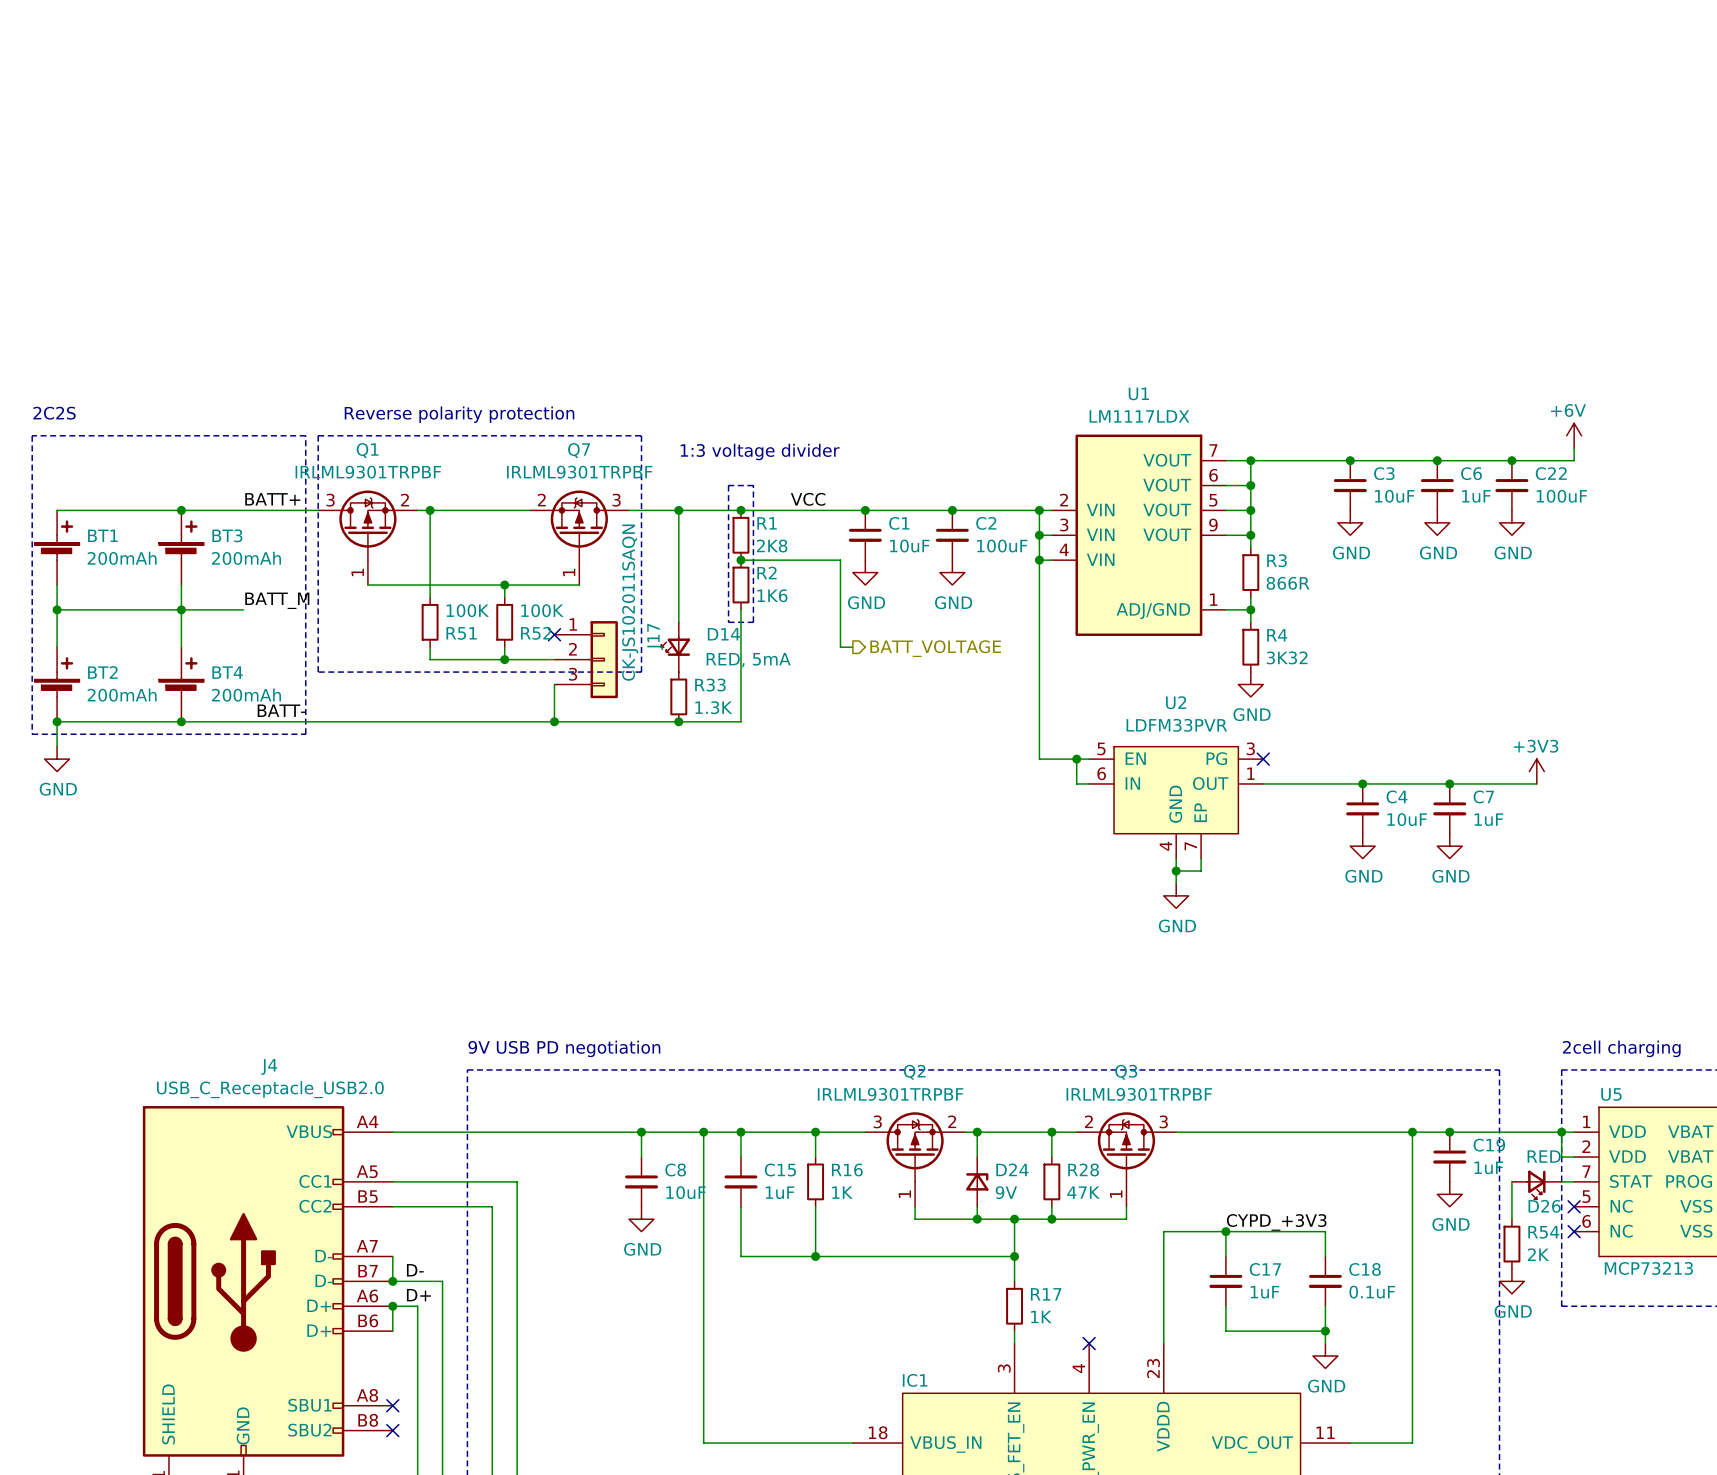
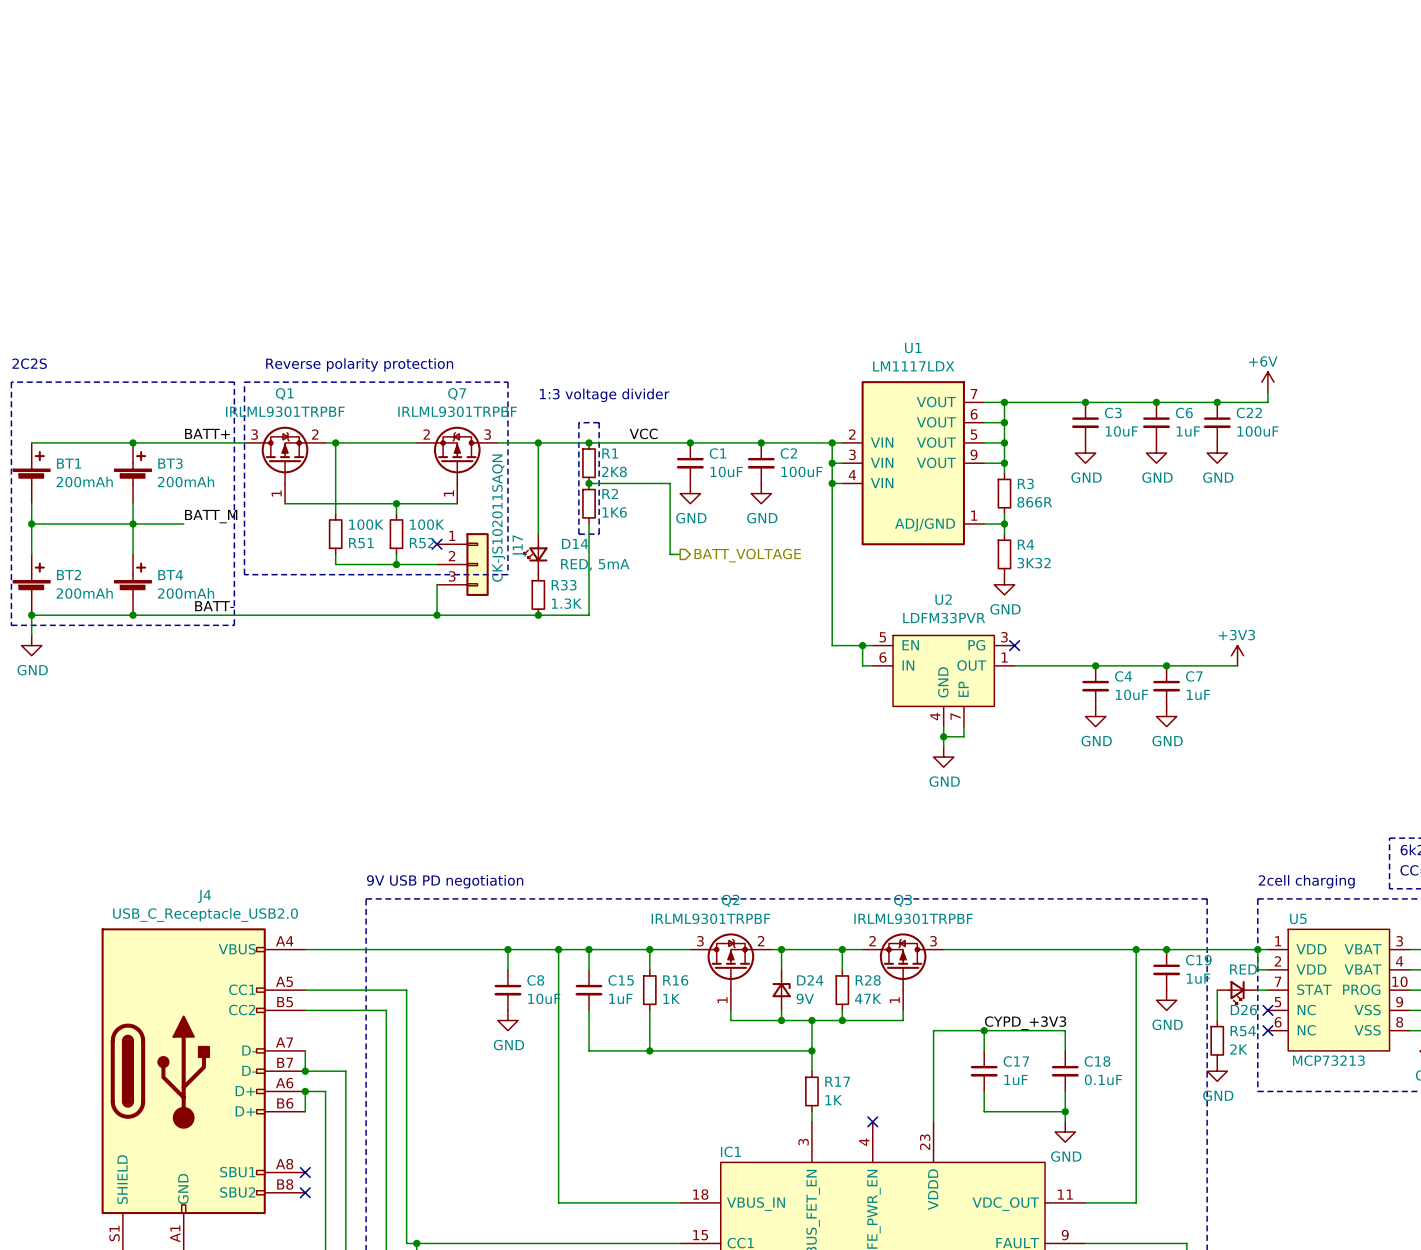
label: D- (415, 1270) -> none
label: D+ (418, 1295) -> none

